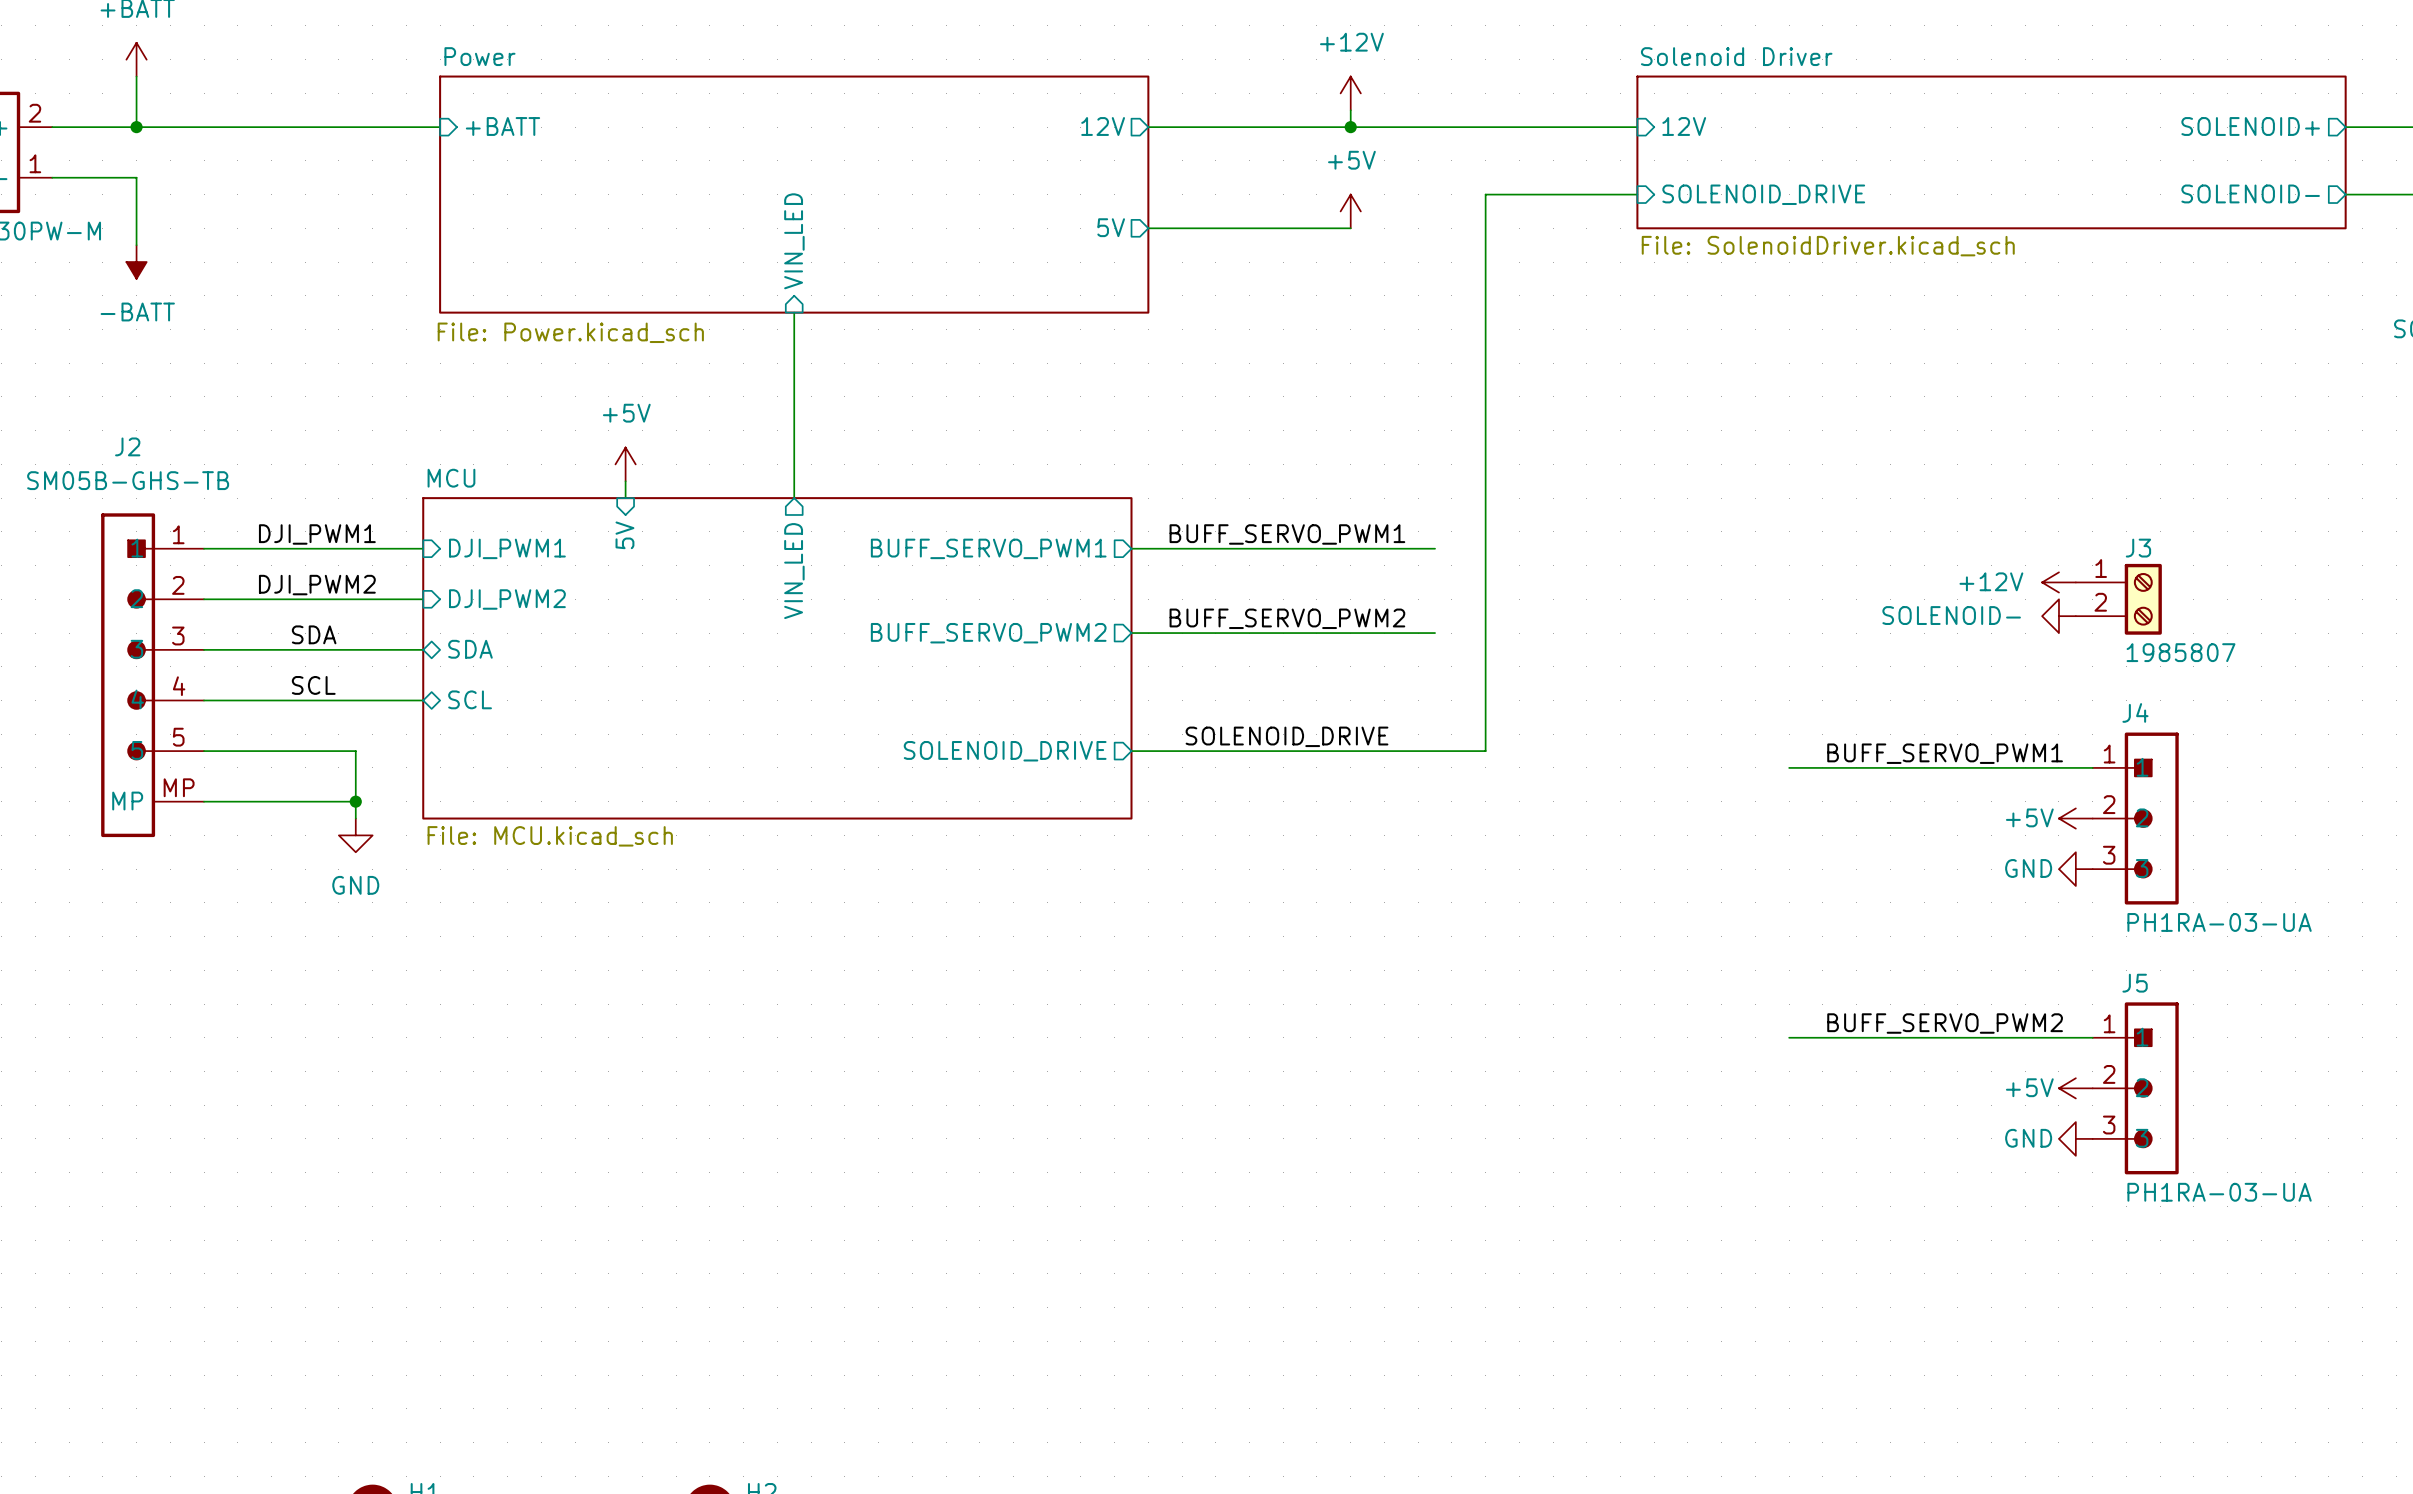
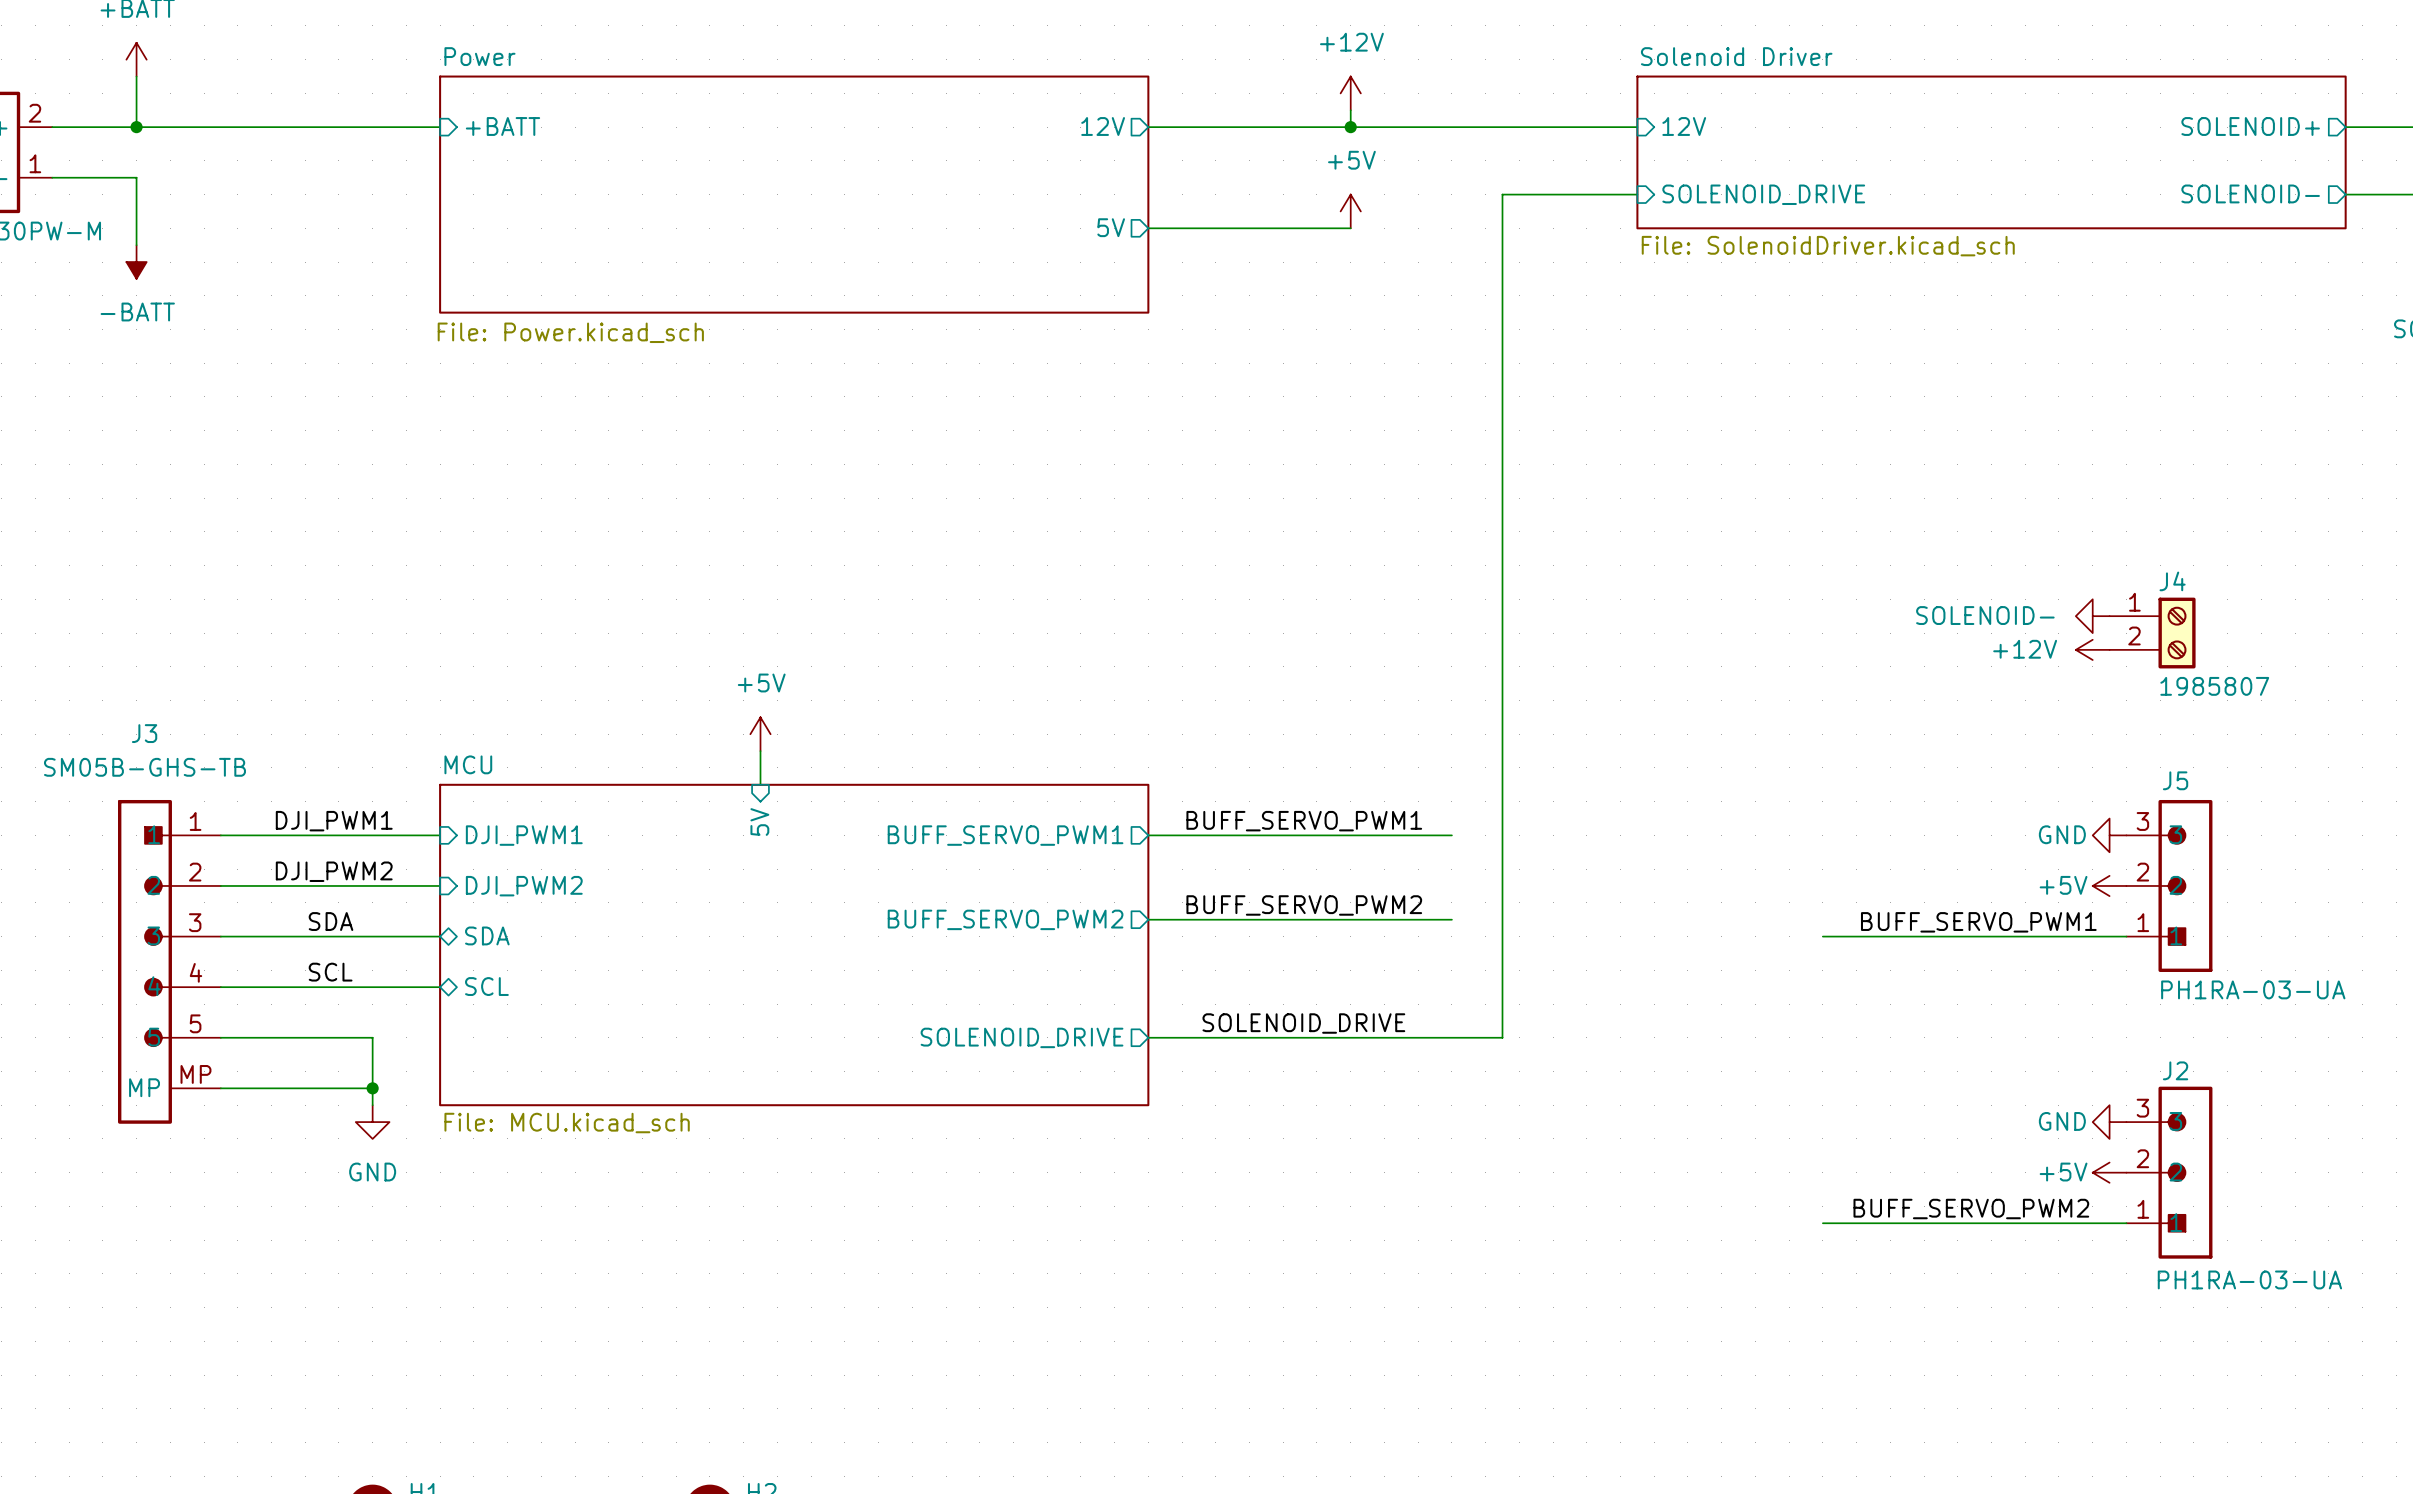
wire: (1502, 194) (1485, 194) (1485, 751) (1131, 751) -> (1502, 194) (1502, 1037) (1148, 1037)
sheet pin: VIN_LED (794, 241) -> none
wire: (794, 312) (794, 498) -> none
J2 name position: J2 (127, 446) -> J2 (2175, 1070)
power symbol position: +5V (625, 464) -> +5V (760, 734)
J2 value: SM05B-GHS-TB (128, 480) -> PH1RA-03-UA (2249, 1279)
wire: (625, 481) (625, 498) -> none
J2 symbol: [101, 513, 205, 838] -> [2126, 1086, 2213, 1259]
label position: DJI_PWM1 (317, 534) -> DJI_PWM1 (334, 821)
label position: BUFF_SERVO_PWM1 (1287, 534) -> BUFF_SERVO_PWM1 (1304, 821)
sheet pin position: 5V (624, 535) -> 5V (759, 822)
wire: (204, 548) (423, 548) -> (220, 835) (440, 835)
sheet pin position: DJI_PWM1 (507, 548) -> DJI_PWM1 (524, 835)
sheet pin position: BUFF_SERVO_PWM1 (988, 548) -> BUFF_SERVO_PWM1 (1005, 835)
wire: (1131, 548) (1435, 548) -> (1148, 835) (1451, 835)
J3 name position: J3 (2138, 548) -> J3 (144, 733)
J3 symbol: [2075, 563, 2162, 635] -> [118, 799, 221, 1124]
sheet pin: VIN_LED (794, 571) -> none
power symbol position: +12V (2058, 582) -> +12V (2092, 649)
label position: DJI_PWM2 (317, 585) -> DJI_PWM2 (334, 871)
wire: (204, 599) (423, 599) -> (220, 885) (440, 885)
sheet pin position: DJI_PWM2 (507, 599) -> DJI_PWM2 (524, 886)
power symbol position: SOLENOID- (2058, 616) -> SOLENOID- (2092, 616)
label position: BUFF_SERVO_PWM2 (1287, 618) -> BUFF_SERVO_PWM2 (1304, 905)
sheet pin position: BUFF_SERVO_PWM2 (988, 633) -> BUFF_SERVO_PWM2 (1005, 919)
wire: (1131, 633) (1435, 633) -> (1148, 919) (1451, 919)
label position: SDA (314, 634) -> SDA (331, 921)
wire: (204, 649) (423, 649) -> (220, 936) (440, 936)
sheet pin position: SDA (470, 649) -> SDA (487, 935)
J3 value: 1985807 (2181, 652) -> SM05B-GHS-TB (144, 767)
sheet MCU position: (777, 658) -> (794, 945)
label position: SCL (313, 685) -> SCL (330, 972)
sheet pin position: SCL (470, 699) -> SCL (486, 986)
wire: (204, 700) (423, 700) -> (220, 987) (440, 987)
J4 name position: J4 (2135, 712) -> J4 (2172, 581)
J4 symbol: [2092, 732, 2179, 905] -> [2109, 597, 2196, 669]
label position: SOLENOID_DRIVE (1287, 736) -> SOLENOID_DRIVE (1303, 1023)
wire: (204, 751) (355, 751) (355, 818) -> (220, 1037) (372, 1037) (372, 1105)
wire: none -> (760, 751) (760, 784)
sheet pin position: SOLENOID_DRIVE (1005, 751) -> SOLENOID_DRIVE (1022, 1037)
label position: BUFF_SERVO_PWM1 (1945, 753) -> BUFF_SERVO_PWM1 (1978, 922)
wire: (1789, 767) (2092, 767) -> none
wire: (204, 801) (355, 801) -> (220, 1088) (372, 1088)
junction: (355, 801) -> none
power symbol position: +5V (2075, 818) -> +5V (2109, 885)
power symbol position: GND (355, 835) -> GND (372, 1122)
power symbol position: GND (2075, 869) -> GND (2109, 835)
J4 value: PH1RA-03-UA (2219, 922) -> 1985807 (2214, 686)
label: BUFF_SERVO_PWM2 (1945, 1023) -> none
wire: (1789, 1037) (2092, 1037) -> (1822, 936) (2126, 936)
junction: none -> (372, 1088)
power symbol position: +5V (2075, 1088) -> +5V (2109, 1172)
J5 position: (2135, 1088) -> (2169, 885)
J5 flip: as is (2151, 1088) -> up-down (2185, 885)
power symbol position: GND (2075, 1138) -> GND (2109, 1122)
label: none -> BUFF_SERVO_PWM2 (1971, 1209)
wire: none -> (1822, 1223) (2126, 1223)

